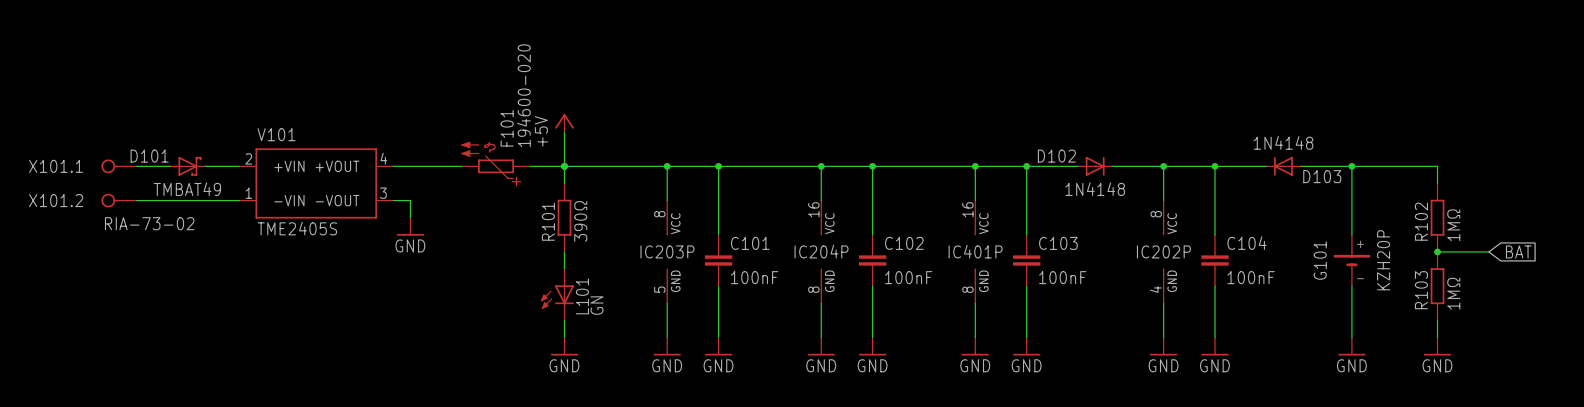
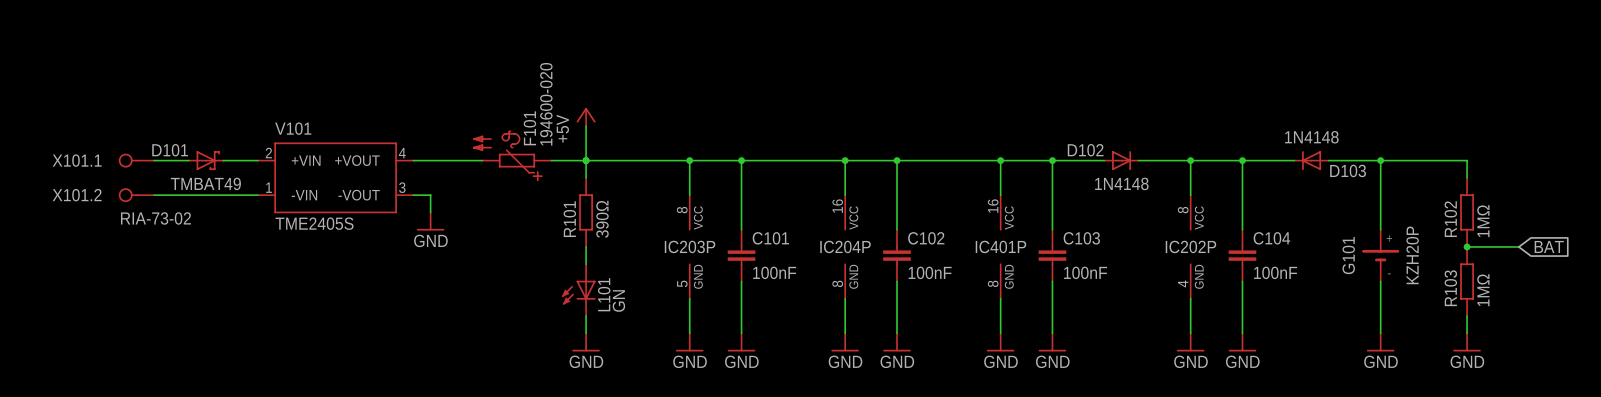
F101 symbol: [461, 141, 531, 187] -> [473, 130, 552, 181]

